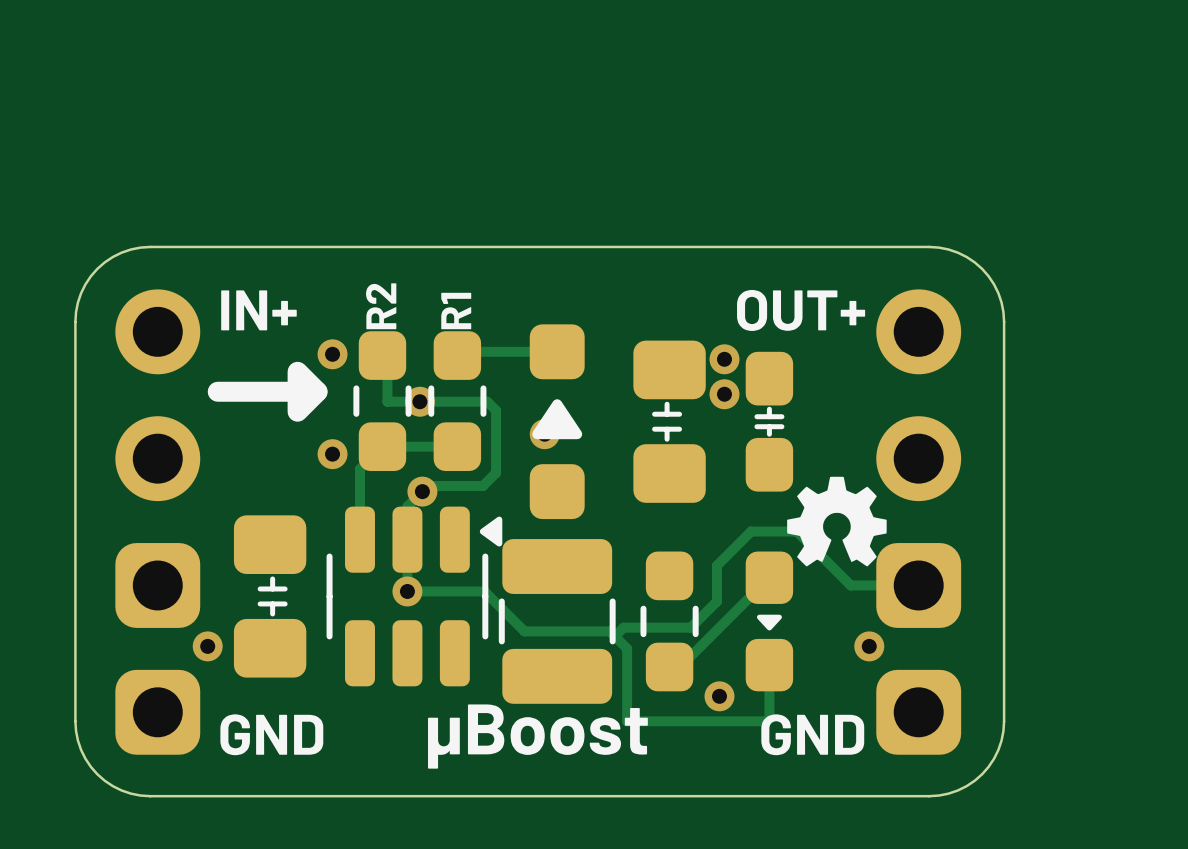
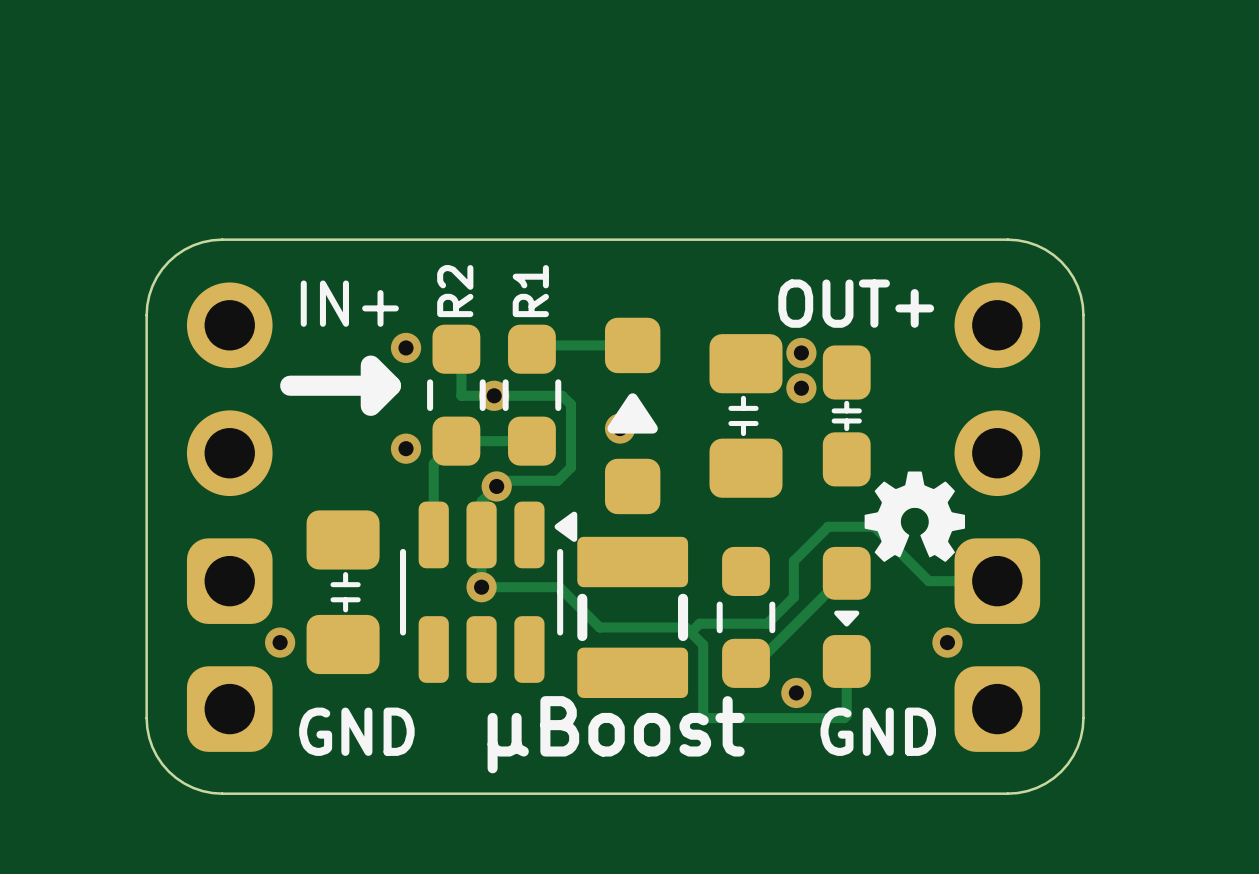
part footprint: [498, 539, 616, 704] -> [577, 536, 689, 698]

